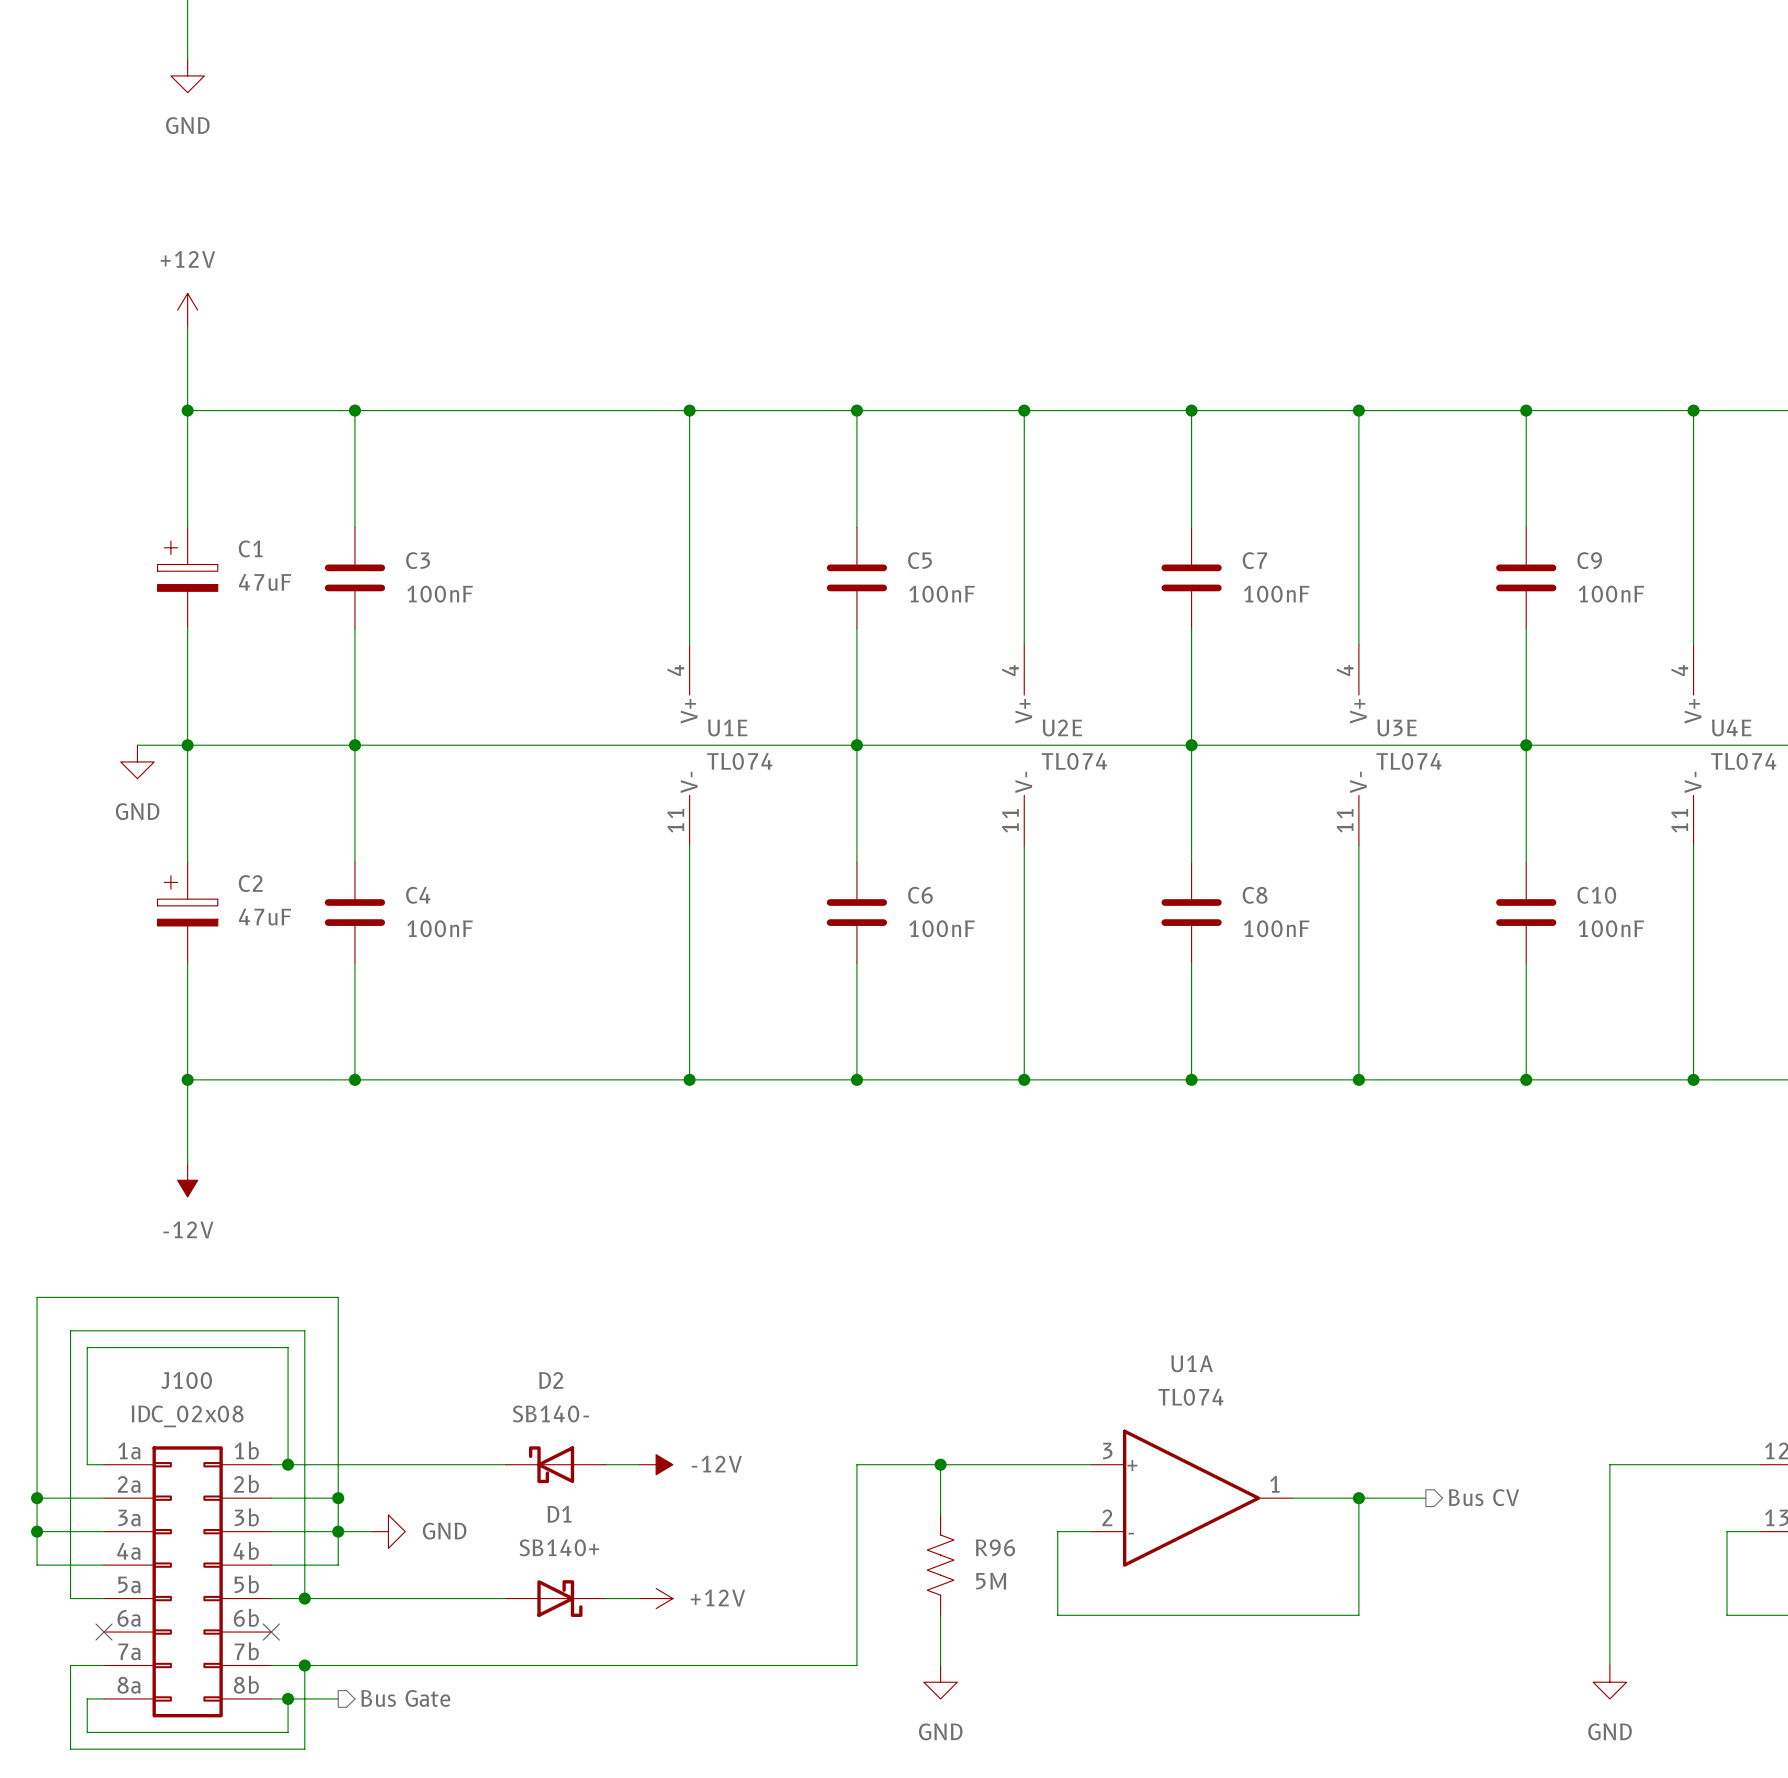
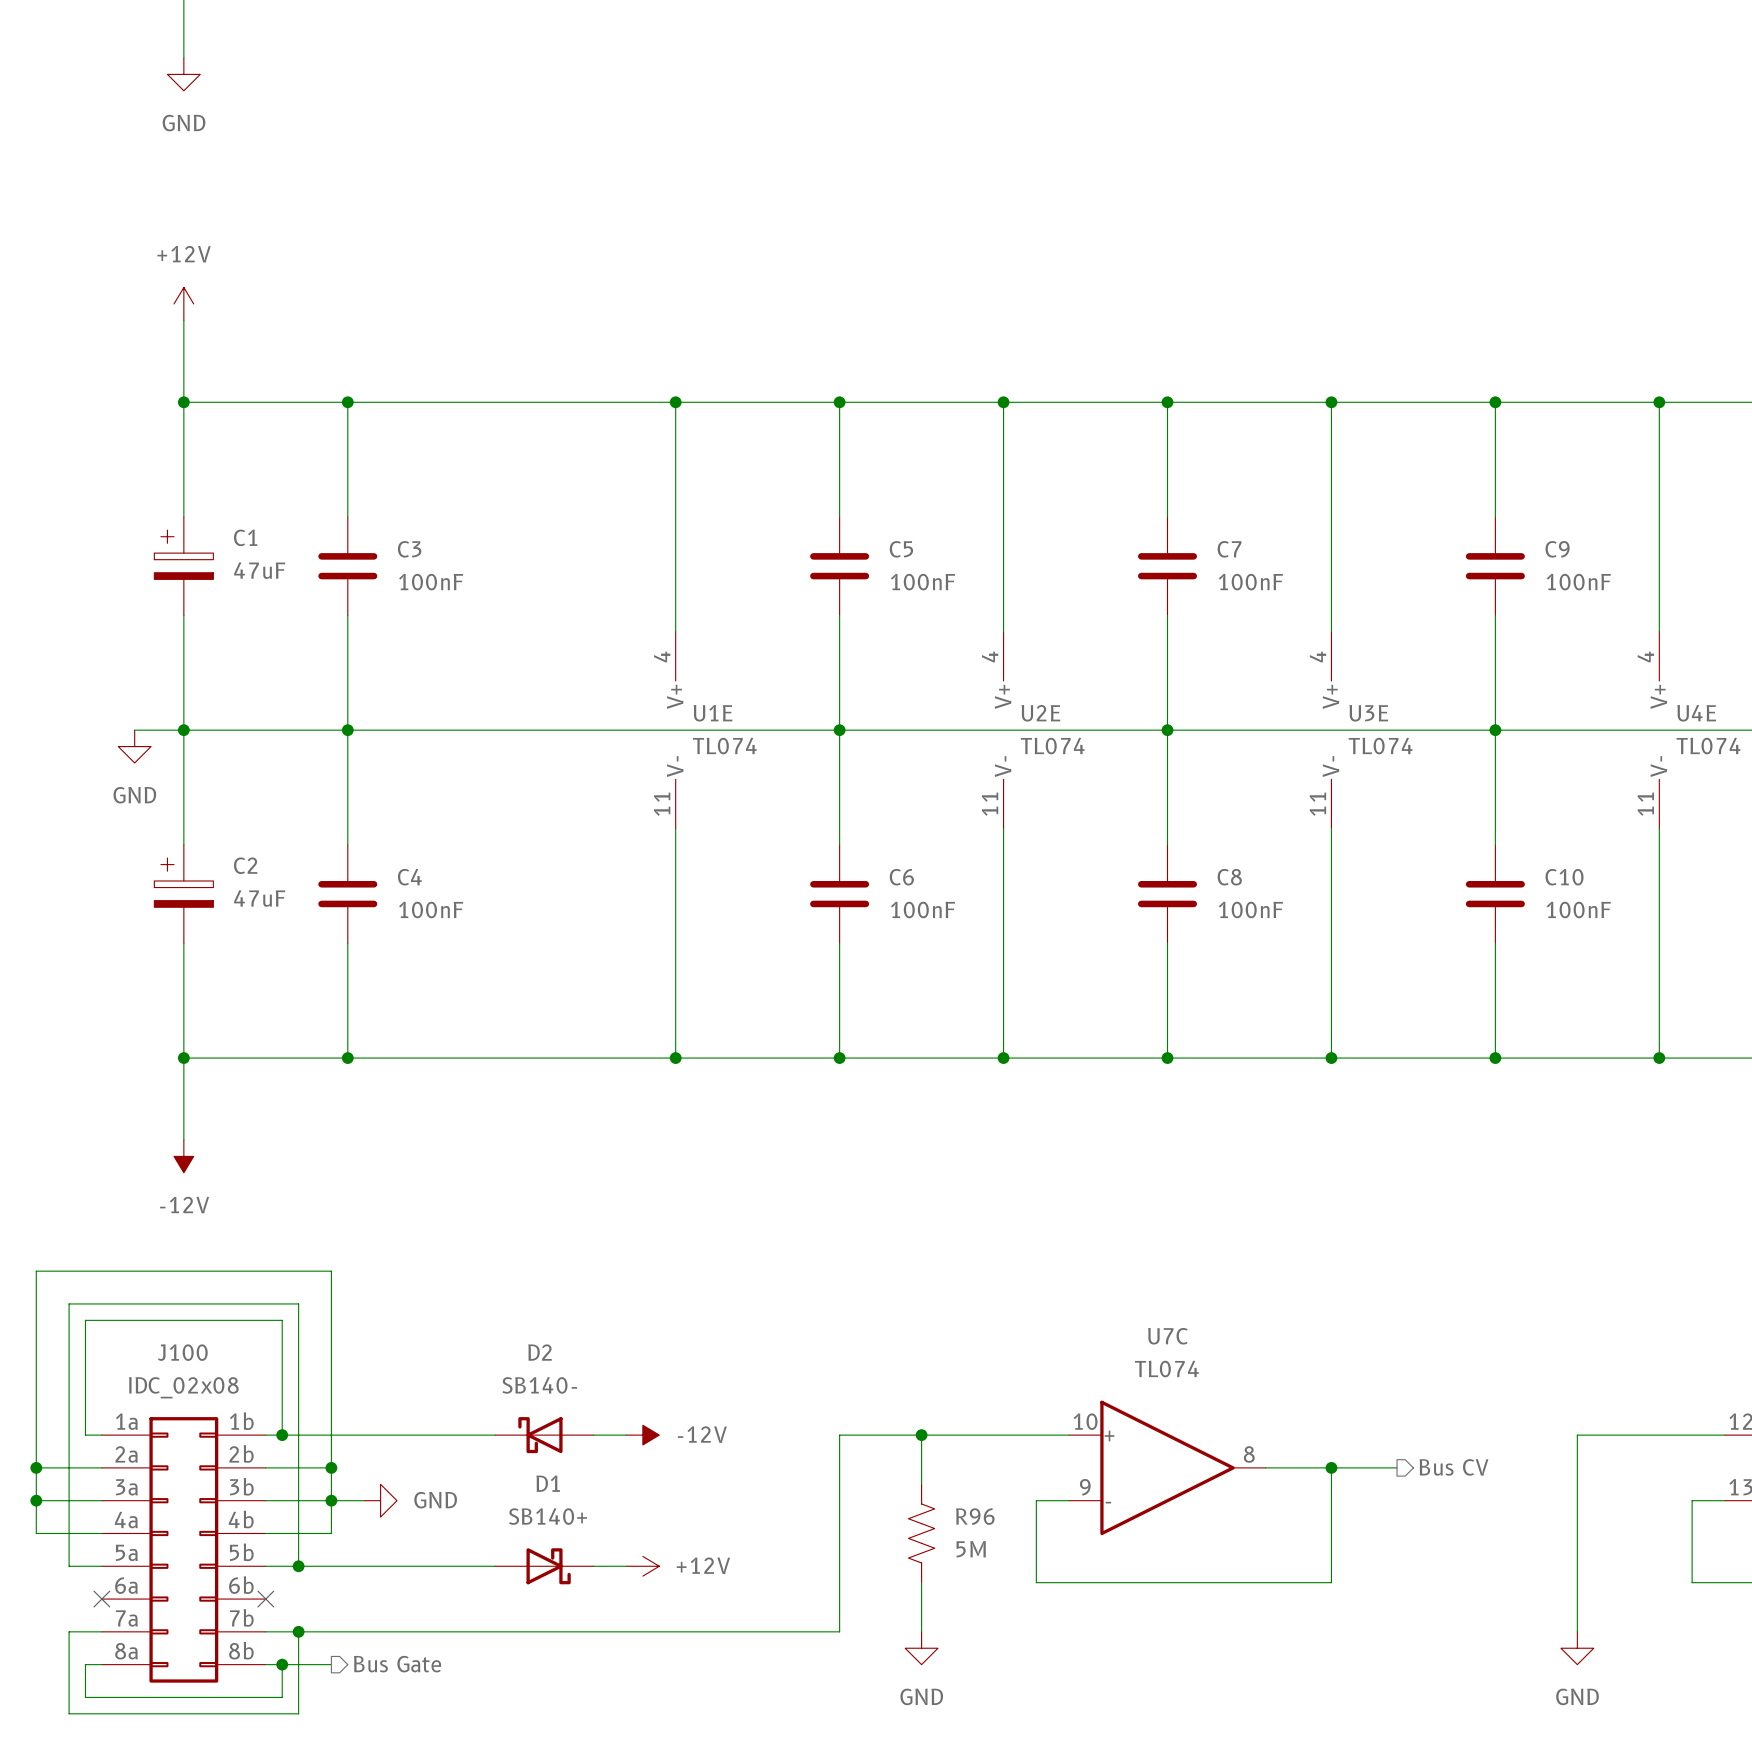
U1A name: U1A (1192, 1363) -> U7C (1167, 1336)
U1A pin number: 3 (1107, 1451) -> 10 (1085, 1421)
U1A pin number: 1 (1274, 1484) -> 8 (1249, 1454)
U1A pin number: 2 (1107, 1517) -> 9 (1085, 1487)

